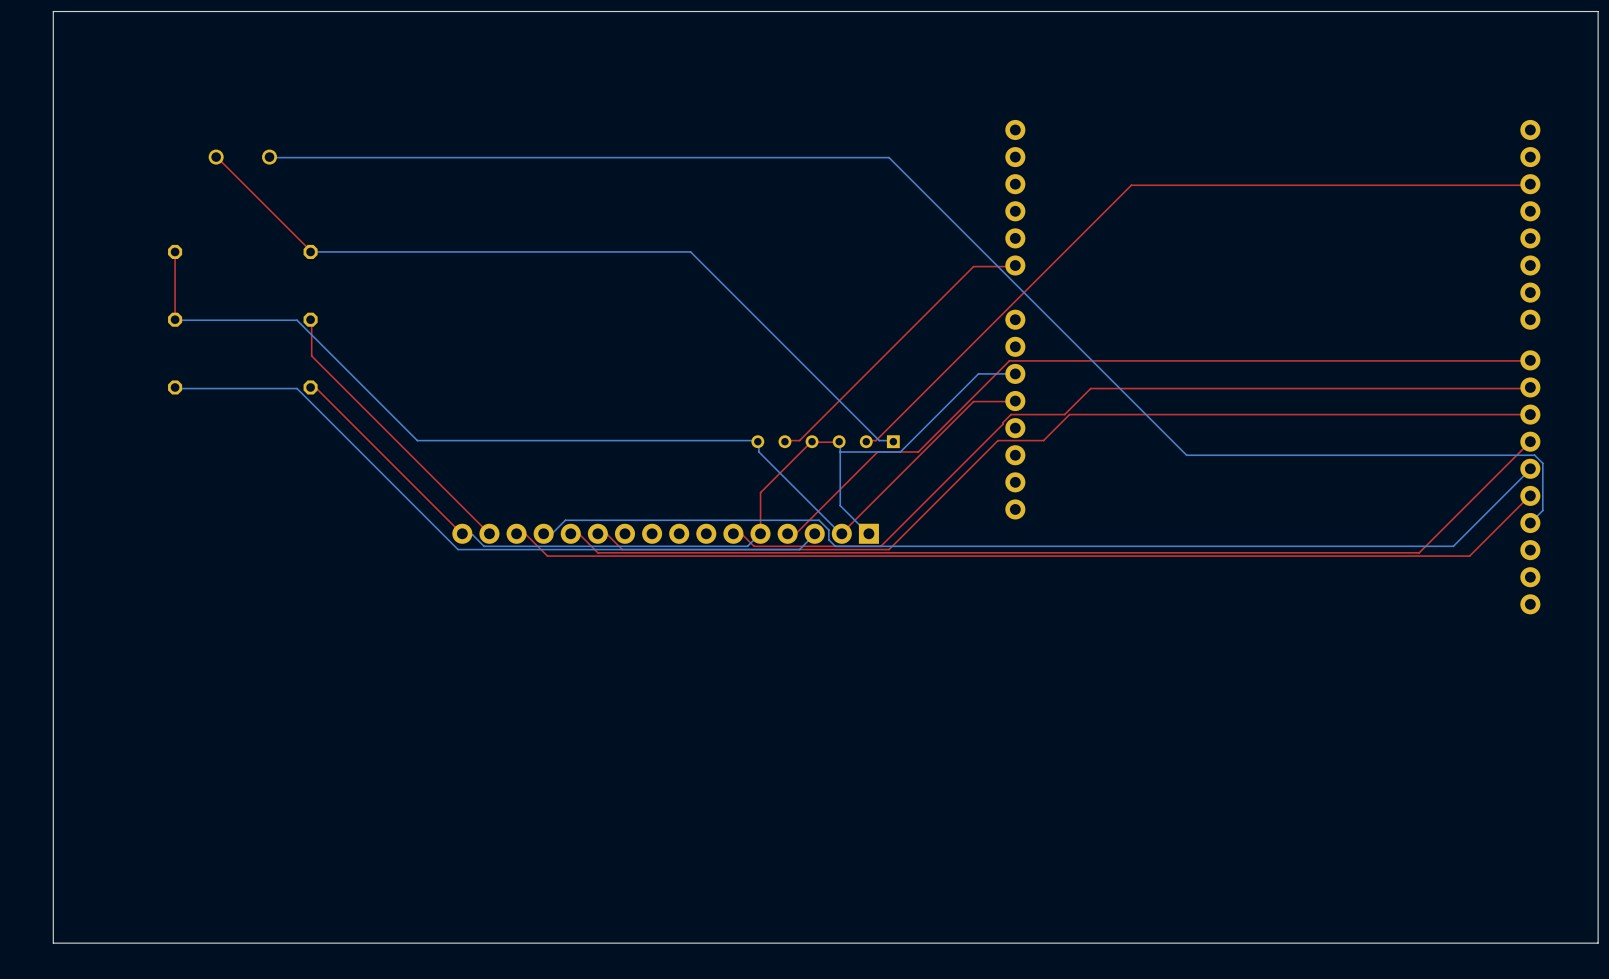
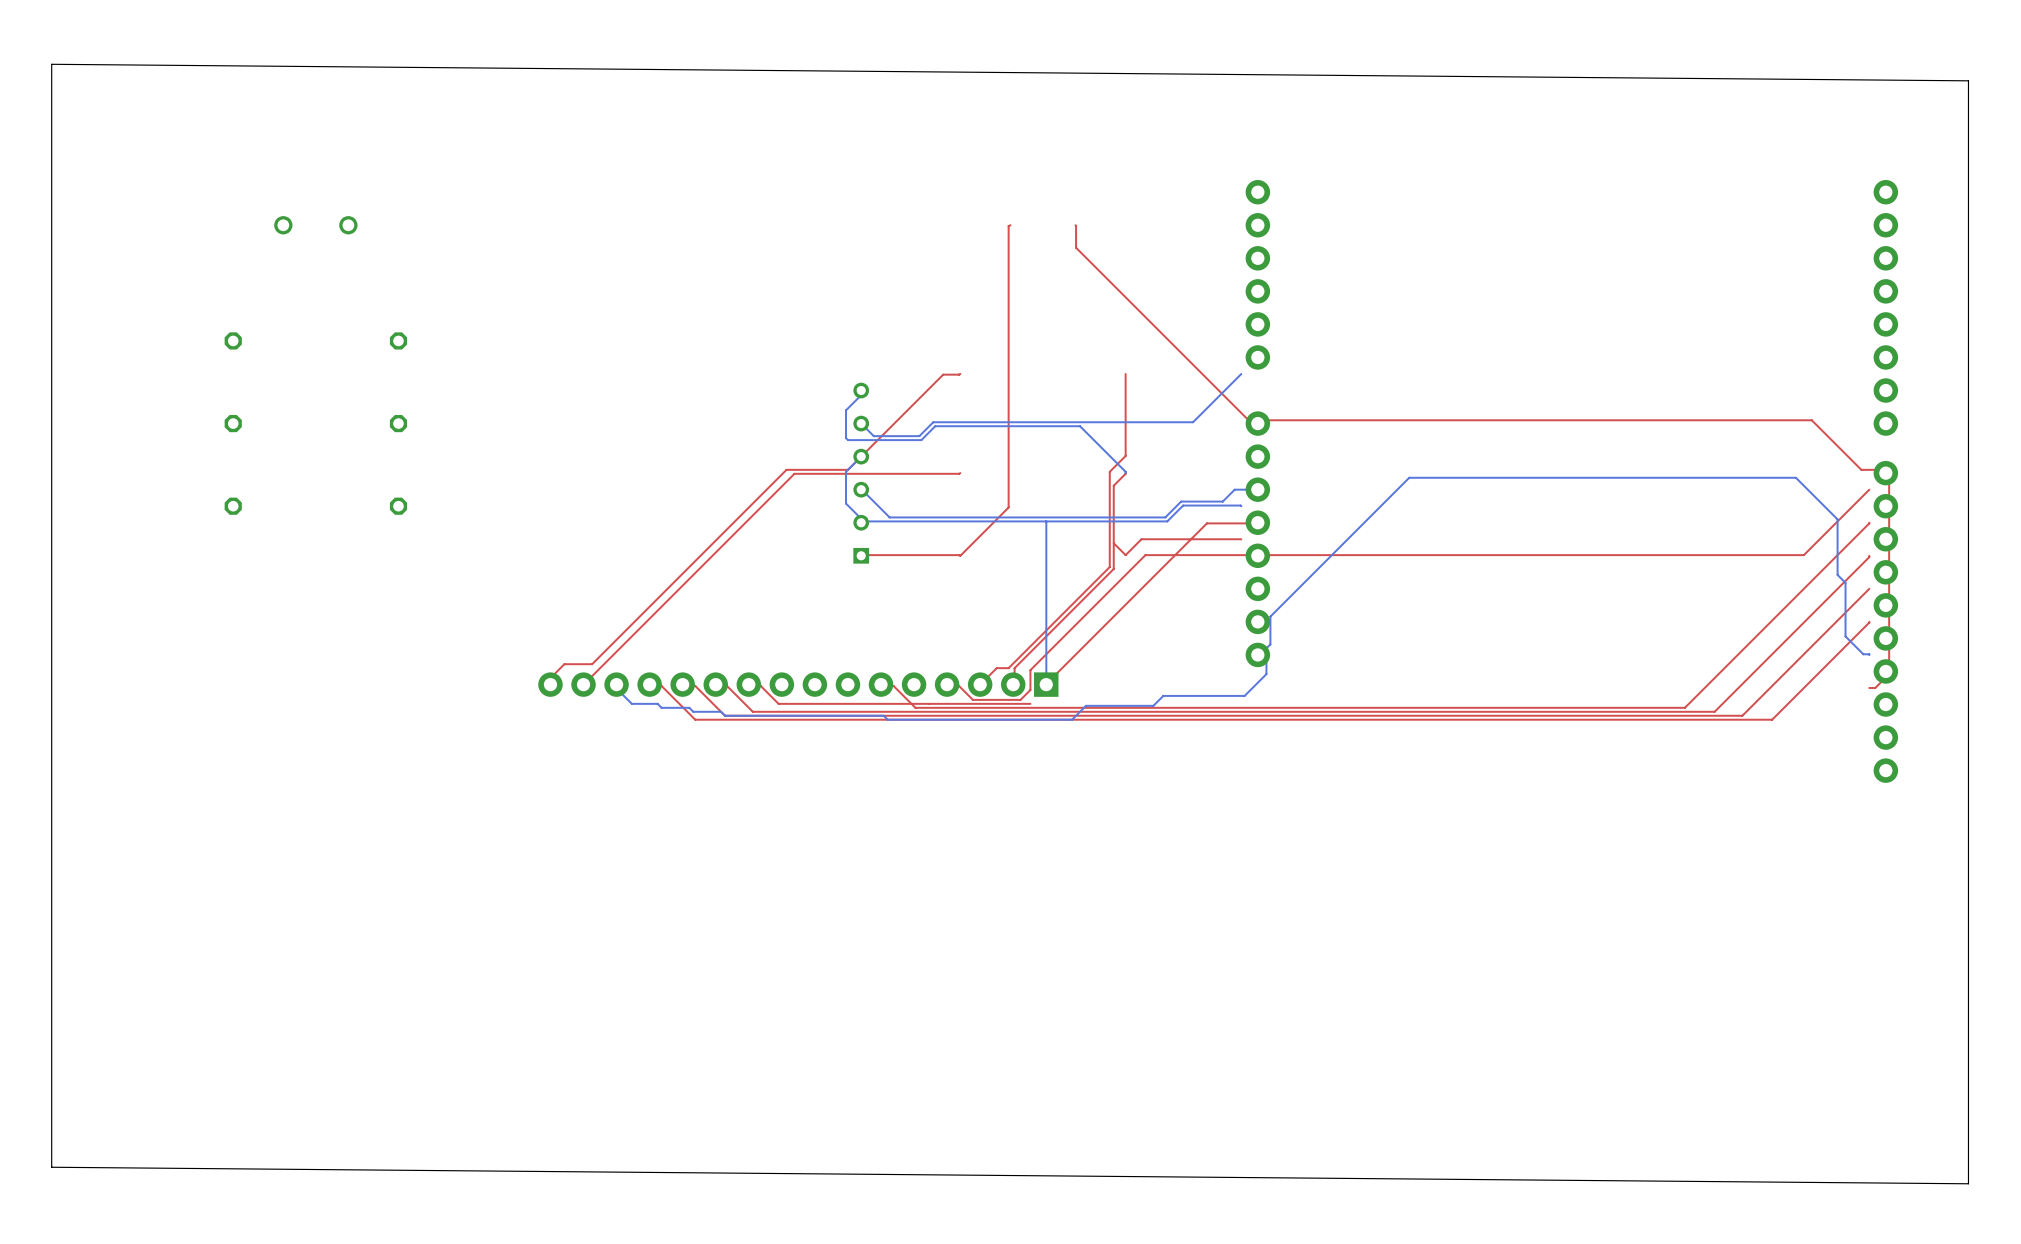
board edge: (1598, 38) (1598, 11) (53, 11) (53, 943) (1598, 943) -> (1968, 80) (51, 64) (51, 1167) (1968, 1183)
top track: (216, 157) (310, 251) -> none
bottom track: (269, 157) (889, 157) (1186, 455) (1534, 455) (1542, 463) (1542, 510) (1530, 523) -> none
top track: none -> (1010, 225) (1008, 225) (1008, 507) (960, 555) (861, 555)
top track: none -> (1075, 225) (1076, 247) (1248, 420) (1811, 420) (1861, 469) (1887, 469) (1889, 471) (1889, 674) (1875, 687) (1869, 687)
top track: (1530, 184) (1131, 185) (876, 440) (866, 441) -> none
top track: (175, 251) (175, 319) -> none
bottom track: (310, 251) (690, 251) (879, 440) (893, 441) -> none
top track: (1015, 265) (973, 266) (799, 440) (784, 441) -> none
top track: none -> (960, 373) (943, 374) (848, 469) (786, 469) (592, 664) (564, 664) (550, 678) (550, 684)
bottom track: none -> (1241, 373) (1193, 422) (933, 422) (919, 436) (873, 436) (861, 423)
bottom track: none -> (861, 390) (859, 396) (846, 410) (846, 438) (848, 440) (921, 440) (935, 426) (1080, 426) (1125, 473)
bottom track: (175, 319) (297, 320) (417, 440) (757, 440) (758, 451) (841, 533) -> (1046, 521) (1046, 684)
top track: (310, 319) (311, 356) (489, 533) -> none
bottom track: none -> (861, 456) (846, 471) (846, 503) (859, 517) (861, 522) (1167, 521) (1183, 505) (1241, 506)
top track: none -> (1125, 473) (1113, 485) (1113, 569) (1014, 668) (1013, 684)
top track: (1530, 360) (1009, 360) (918, 451) (877, 451) (796, 533) (788, 533) -> (1125, 373) (1125, 455) (1109, 471) (1109, 567) (1008, 668) (996, 668) (980, 684)
bottom track: (996, 373) (978, 373) (900, 451) (840, 451) -> (1234, 489) (1222, 501) (1181, 501) (1165, 517) (889, 517) (861, 489)
bottom track: (175, 387) (297, 388) (458, 549) (501, 549) -> (616, 684) (617, 689) (631, 703)
top track: (310, 387) (316, 388) (462, 533) -> (960, 473) (794, 473) (583, 684)
top track: (1530, 387) (1090, 388) (1064, 414) (1011, 414) (880, 546) (820, 546) -> (1869, 489) (1803, 555) (1145, 555) (1030, 670) (1030, 689) (1020, 699)
top track: none -> (1241, 539) (1141, 539) (1125, 555) (1113, 543)
top track: (1530, 414) (1069, 414) (1043, 440) (998, 440) (889, 549) (828, 549) -> none
part rotation: 0° (825, 441) -> 90° clockwise (861, 473)
part position: (825, 441) -> (861, 473)
bottom track: (839, 441) (840, 505) (868, 533) -> none
top track: (839, 441) (810, 442) (760, 492) (760, 533) -> none
top track: (1530, 441) (1516, 455) -> none
bottom track: (1530, 468) (1453, 546) (835, 546) (828, 539) (828, 530) (819, 520) (565, 520) (552, 533) (543, 533) -> none
top track: none -> (1869, 621) (1772, 719) (695, 719) (687, 711)
top track: (1530, 495) (1469, 556) (1389, 556) -> (1869, 555) (1714, 711)
top track: none -> (682, 684) (695, 686) (725, 715) (1742, 715) (1750, 707)
part position: (665, 533) -> (798, 684)
bottom track: (760, 533) (747, 546) (484, 546) (472, 534) (462, 533) -> none
bottom track: (814, 533) (799, 549) (523, 549) -> (1869, 654) (1863, 654) (1845, 636) (1845, 582) (1837, 574) (1837, 519) (1795, 477) (1409, 477) (1270, 616) (1270, 644) (1266, 648) (1266, 674) (1244, 695) (1163, 695) (1153, 705) (1085, 705) (1072, 719) (887, 719) (883, 715) (725, 715) (721, 711) (693, 711) (689, 707) (661, 707) (657, 703)
top track: (734, 534) (742, 534) (754, 546) (781, 546) -> (947, 684) (959, 686) (972, 699)
top track: (734, 552) (597, 552) -> (915, 707) (893, 686) (881, 684)
top track: (1419, 552) (1365, 552) -> (1869, 522) (1684, 707)
top track: (601, 556) (547, 556) -> (752, 711) (748, 707)

